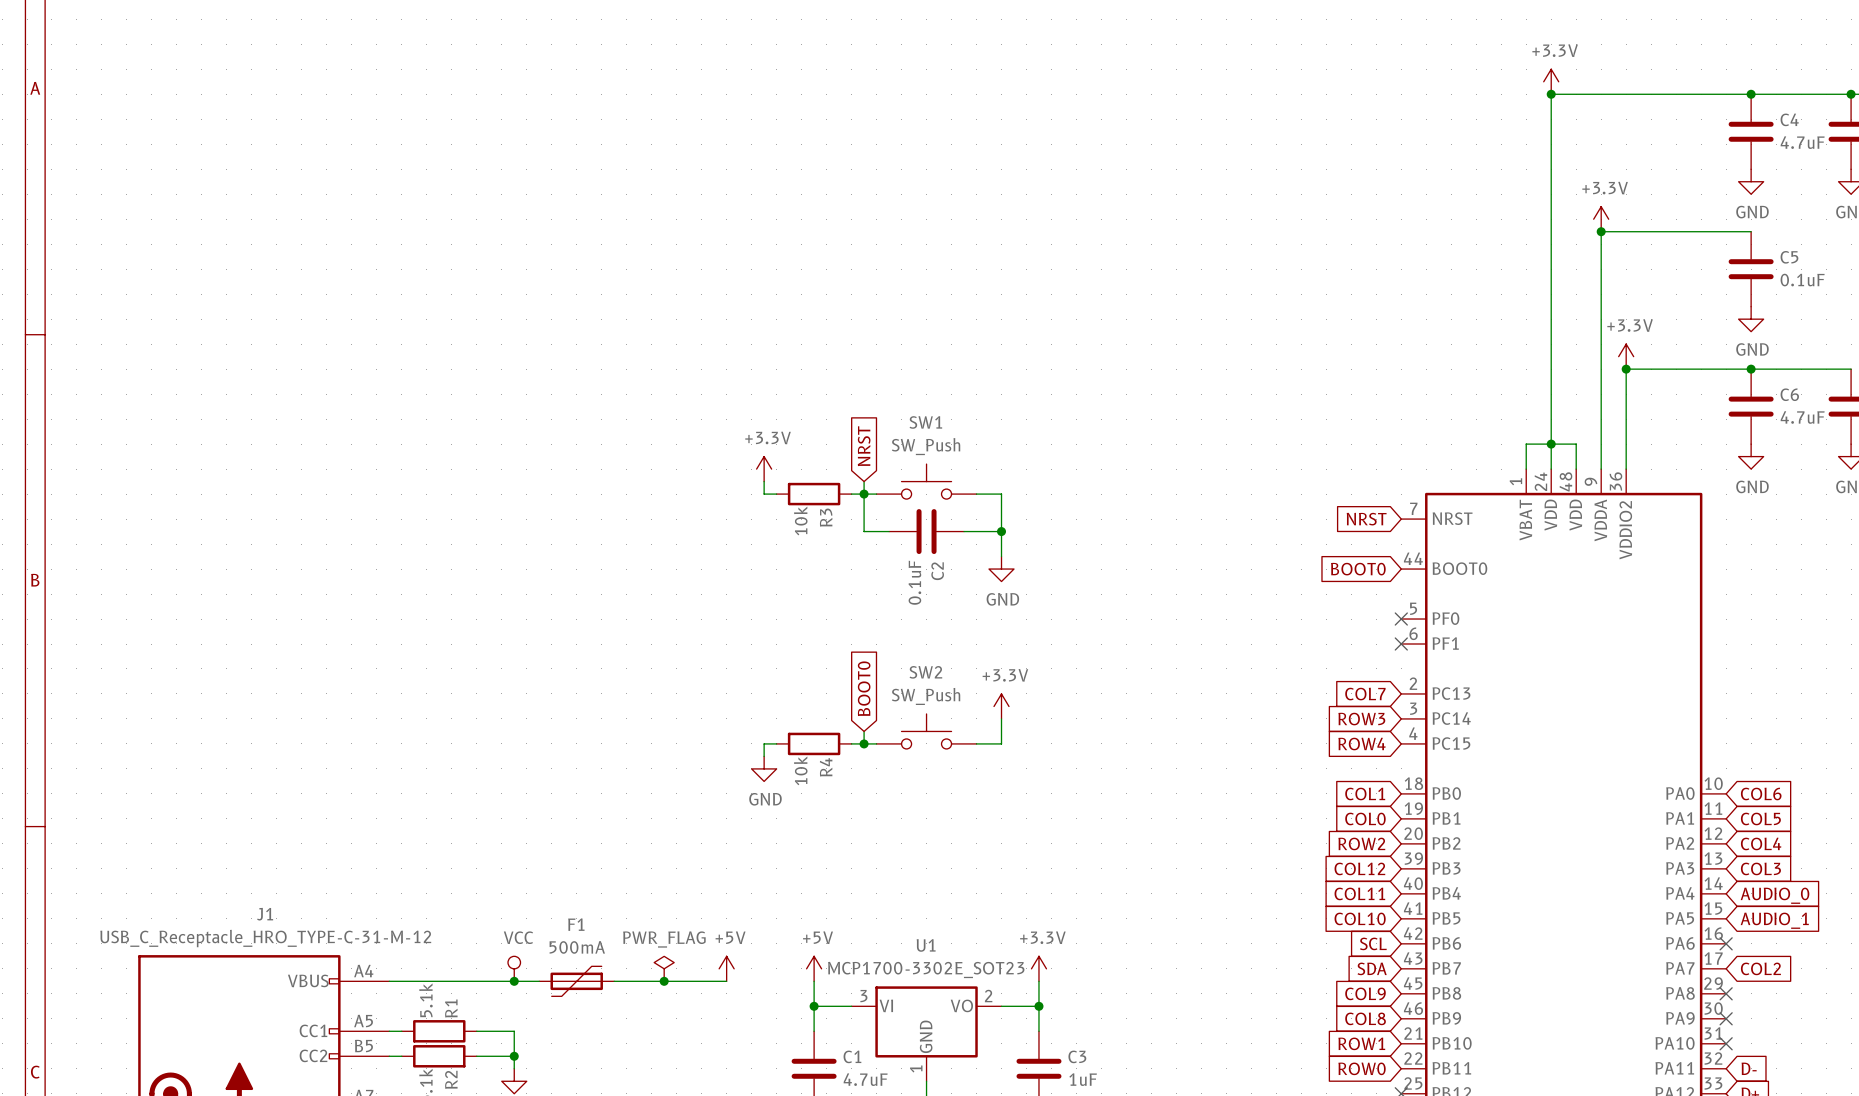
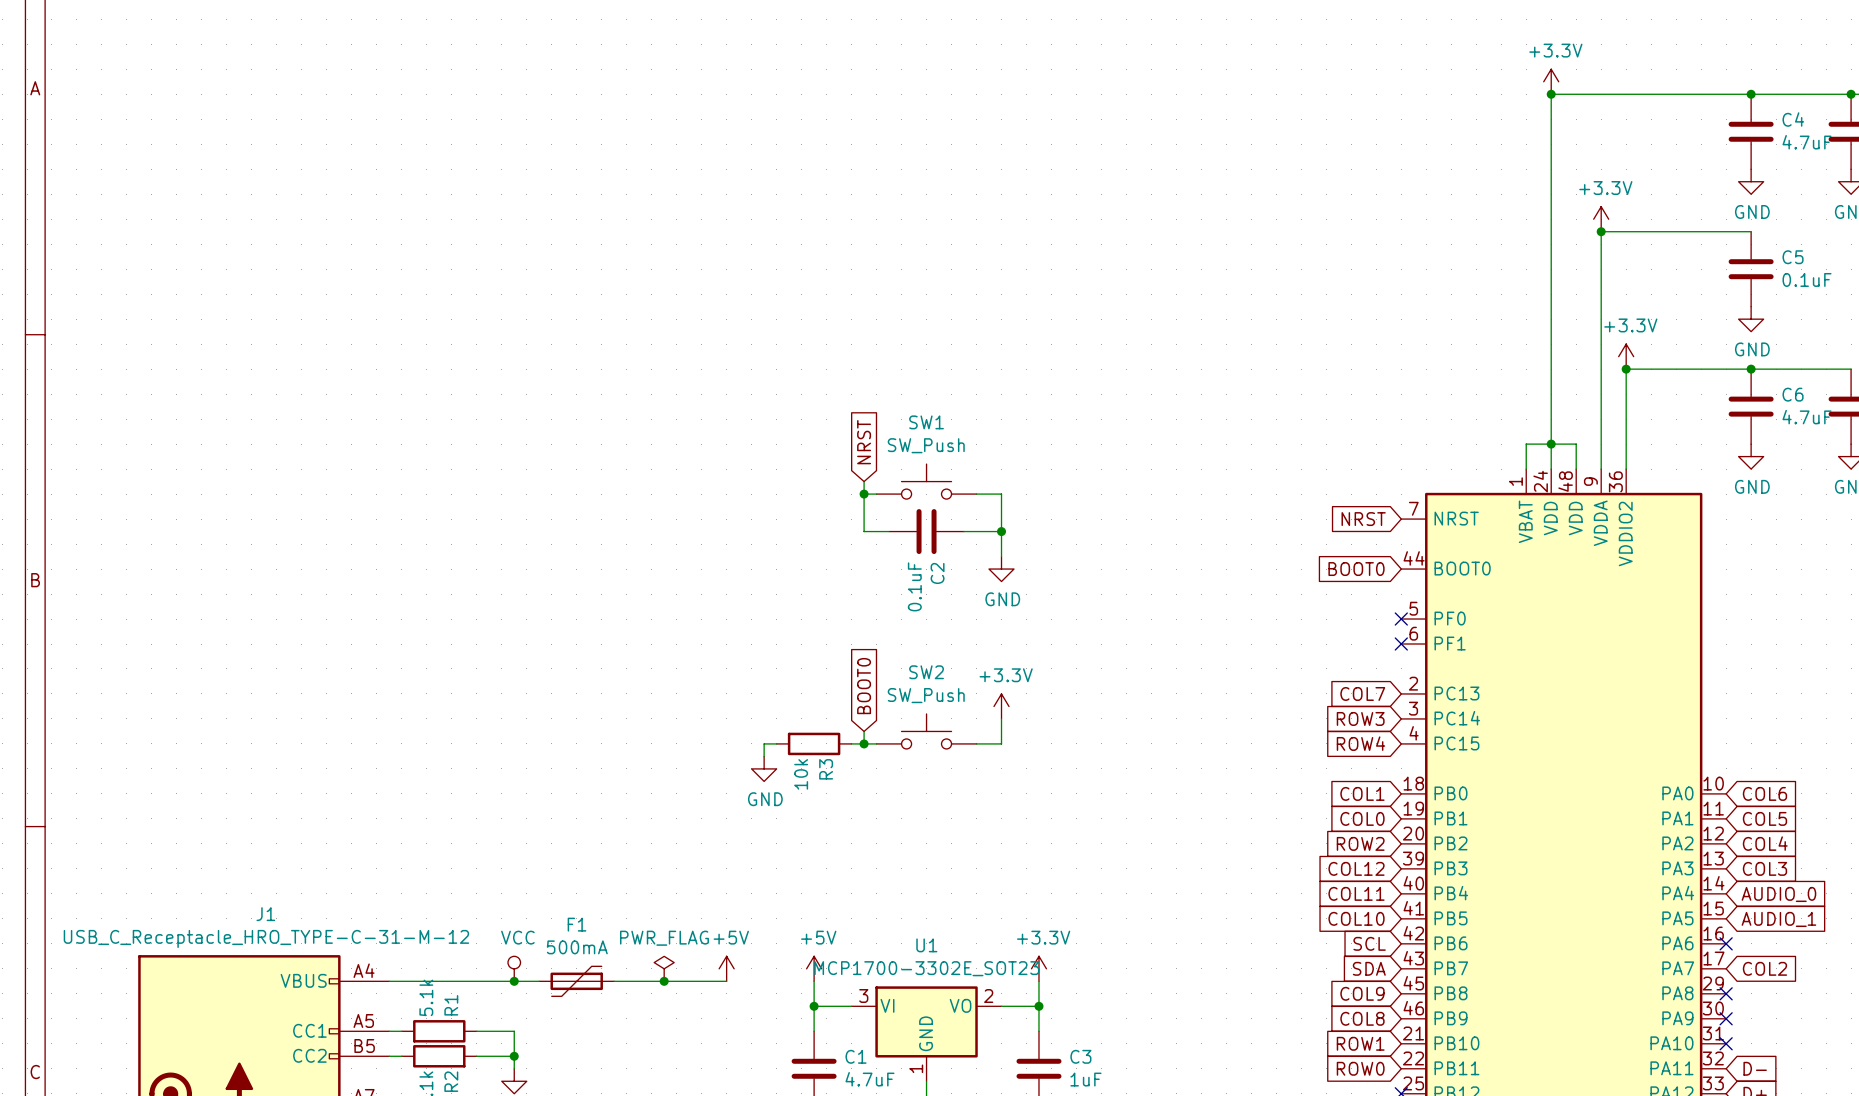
power symbol: +3.3V (764, 469) -> none
wire: (764, 481) (764, 494) (776, 494) -> none
R3: 10k (814, 494) -> none
wire: (851, 494) (864, 494) -> none
R4 name: R4 (826, 767) -> R3 (826, 769)

